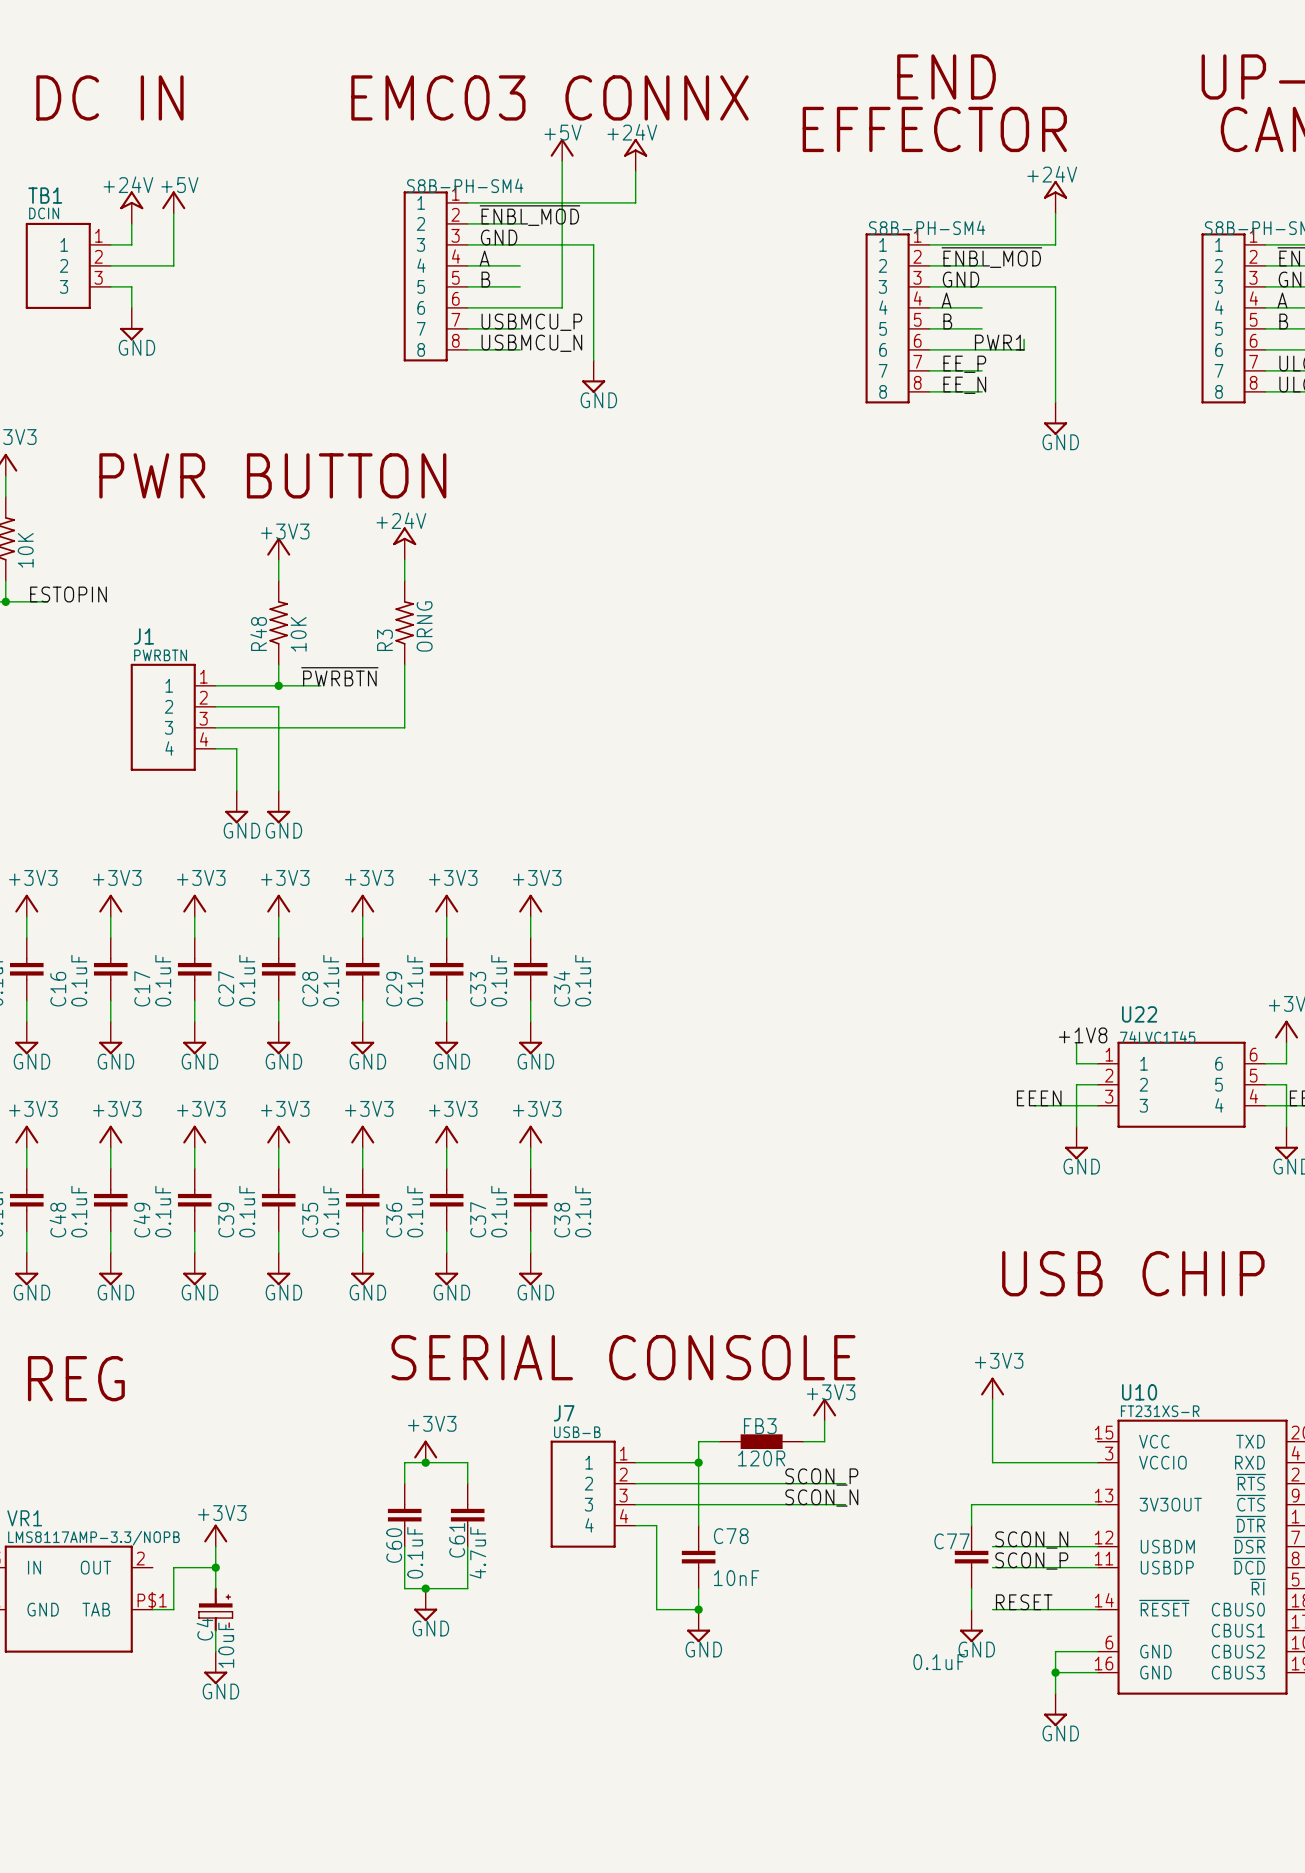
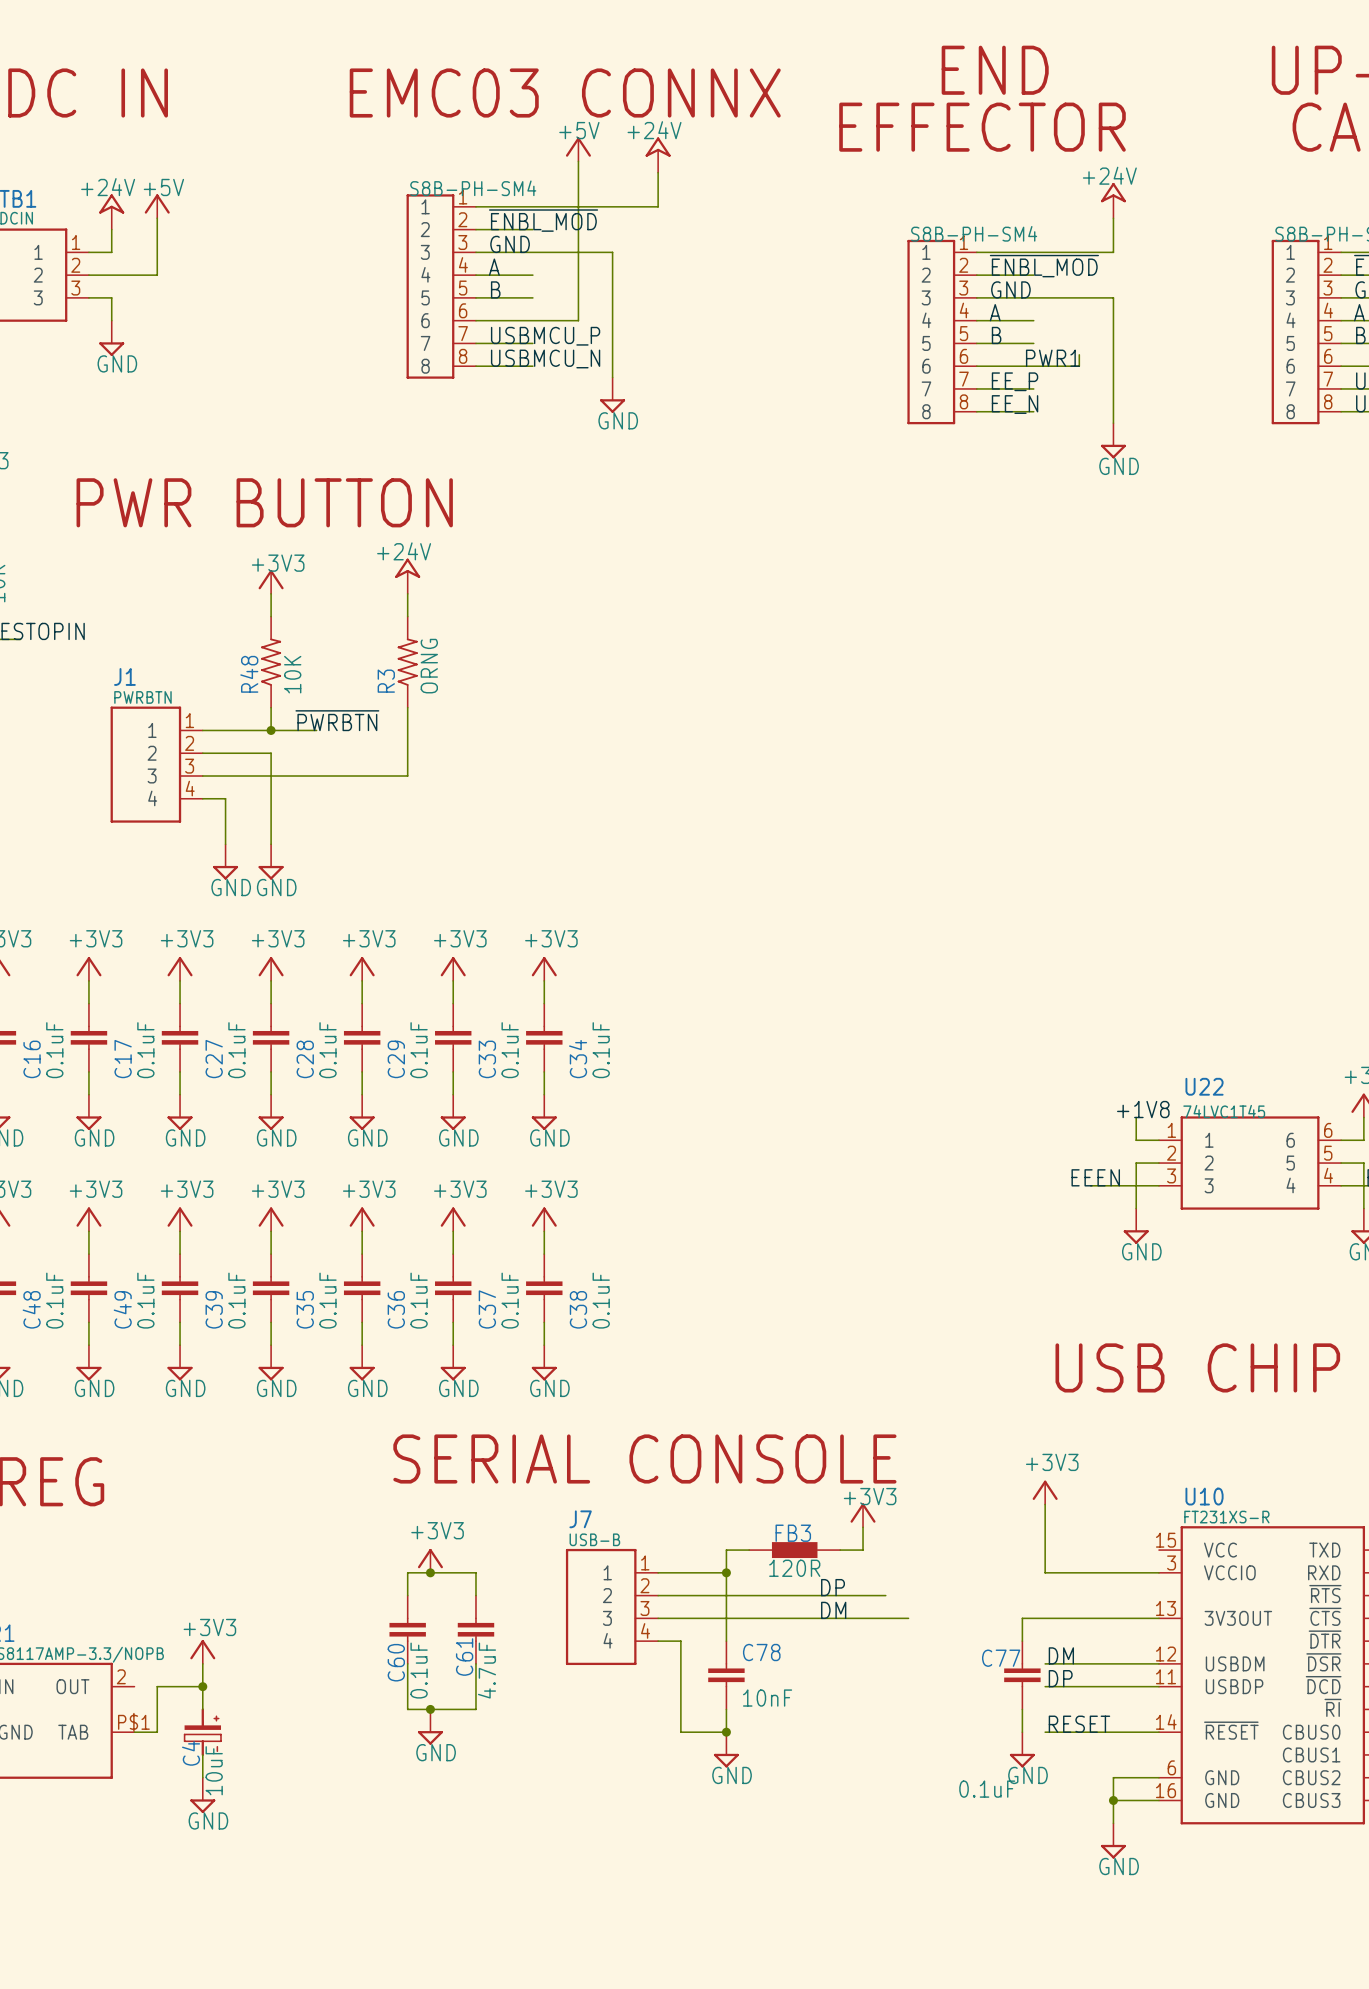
label: SCON_P (821, 1477) -> DP (833, 1587)
label: SCON_N (821, 1498) -> DM (833, 1610)
wire: none -> (885, 1618) (908, 1618)
label: SCON_N (1031, 1540) -> DM (1061, 1655)
label: SCON_P (1031, 1560) -> DP (1060, 1678)

